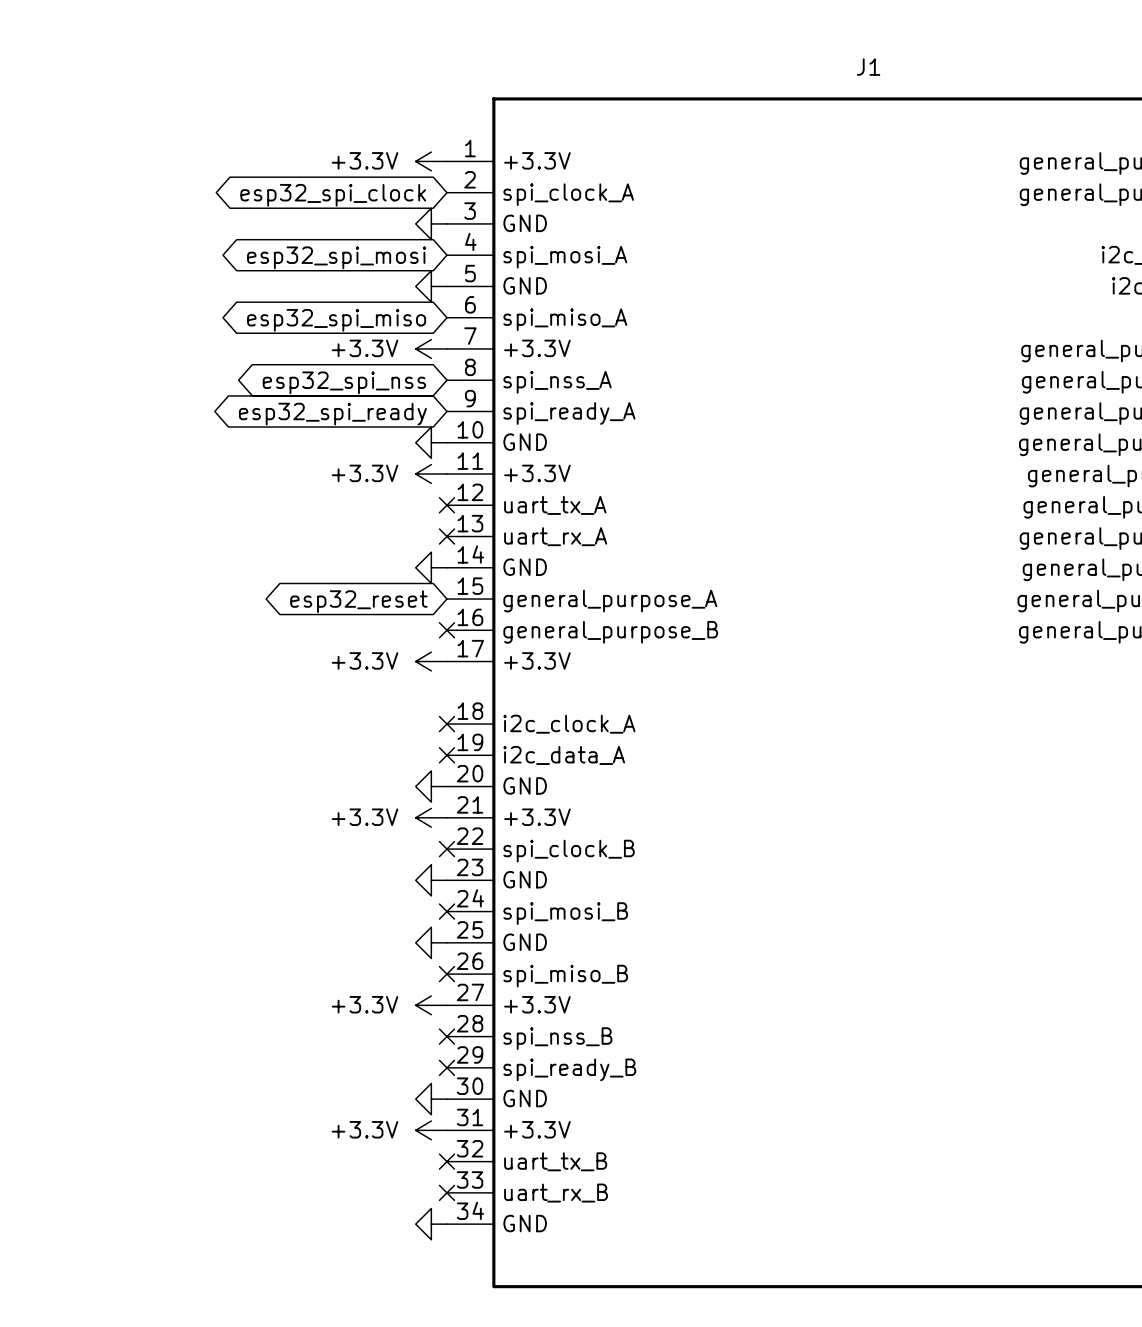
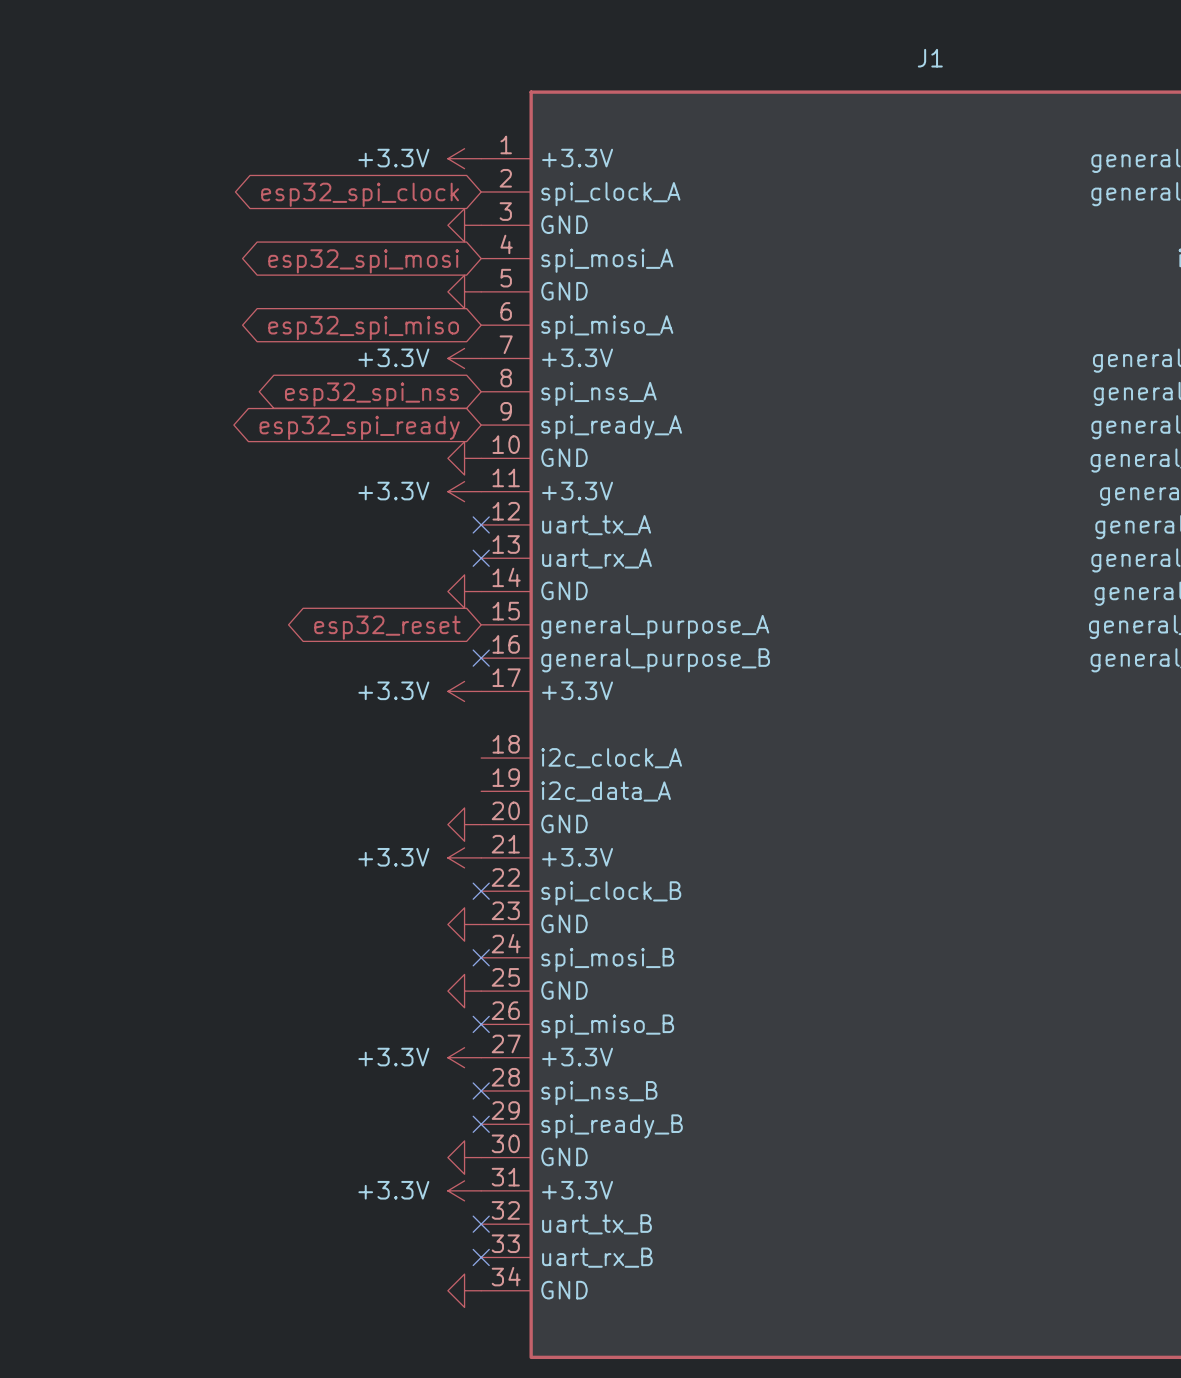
no-connect mark: (446, 724) -> none
no-connect mark: (446, 755) -> none

